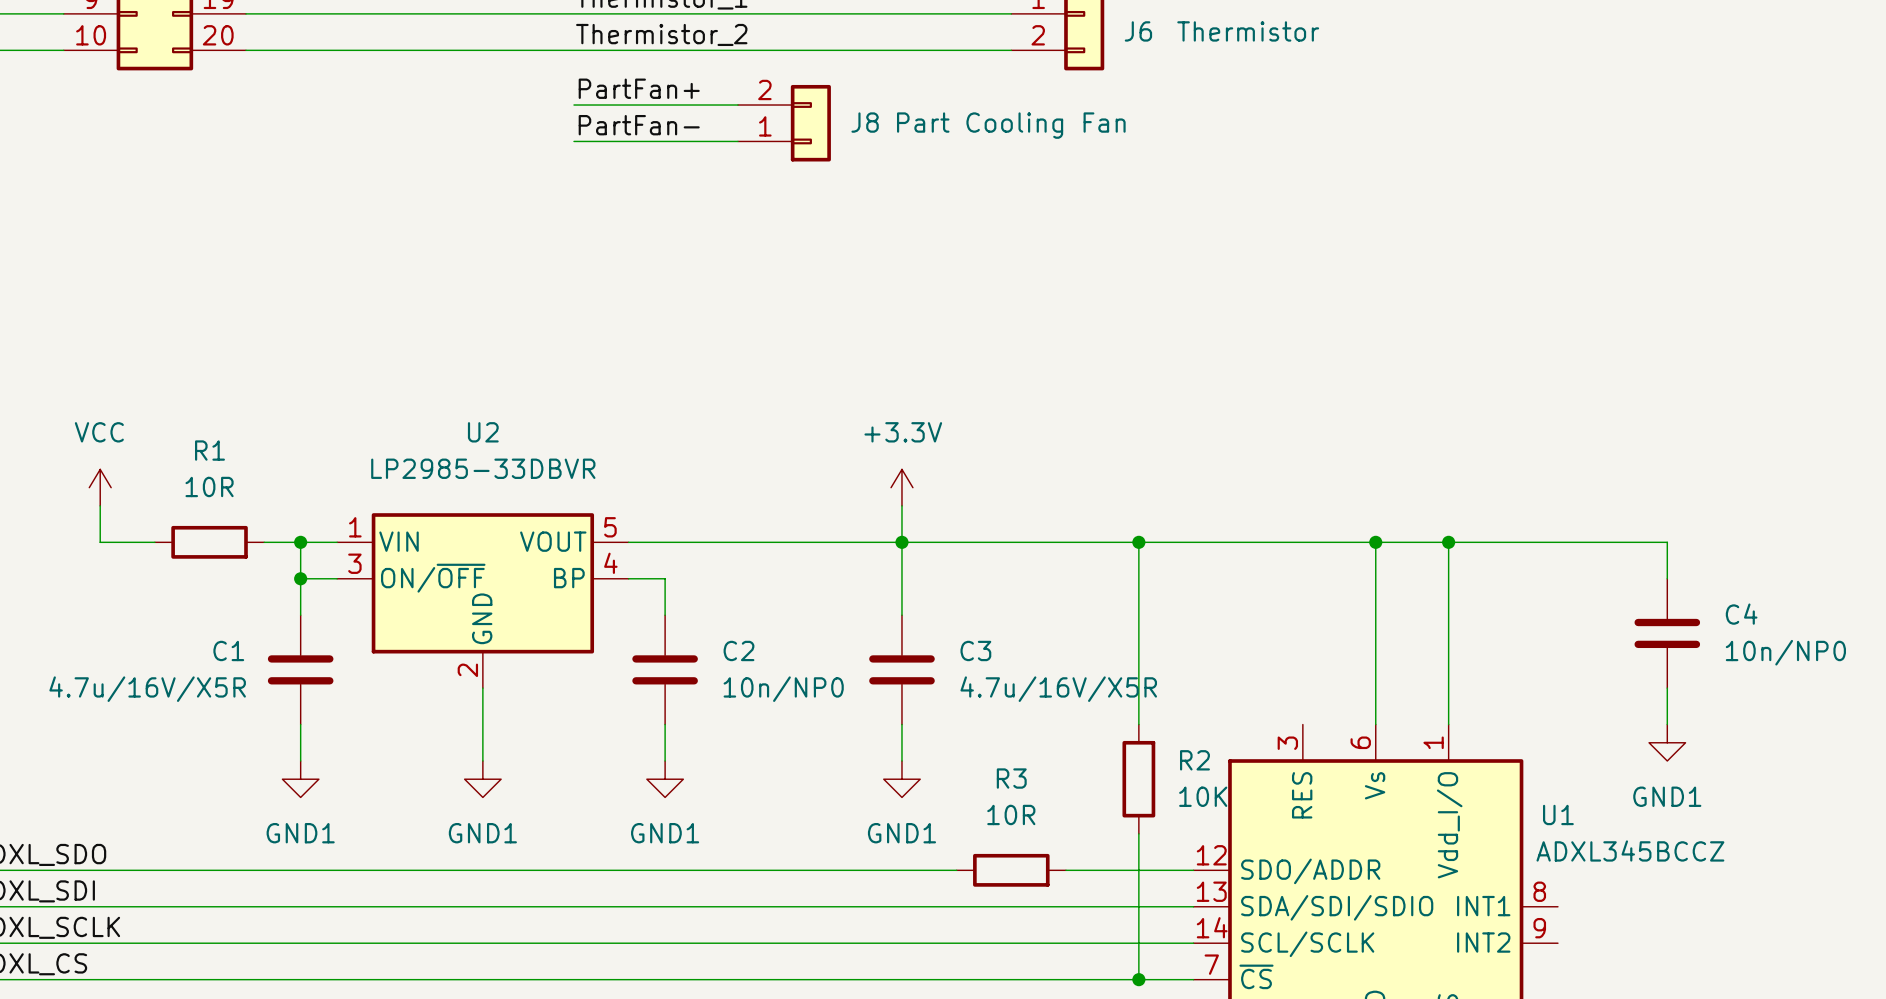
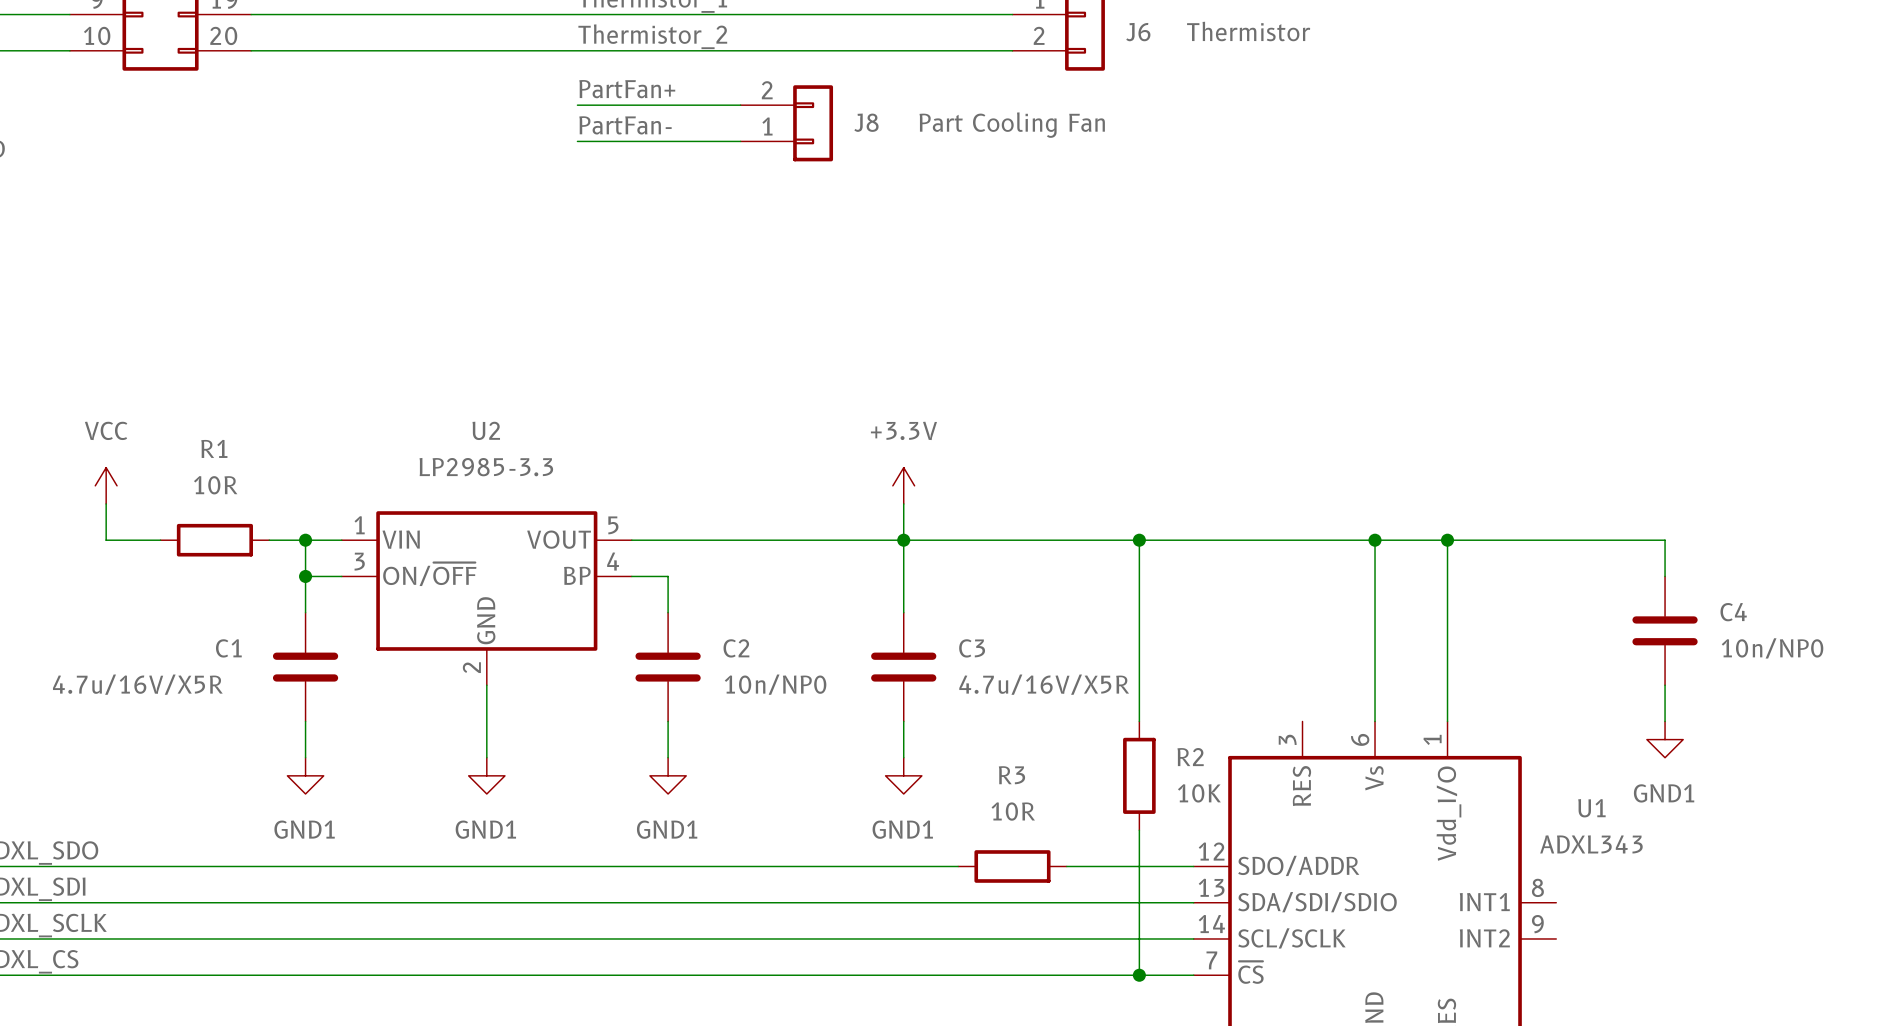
U2 value: LP2985-33DBVR (483, 468) -> LP2985-3.3 (486, 467)
U1 name position: U1 (1558, 814) -> U1 (1591, 808)
U1 value: ADXL345BCCZ (1630, 850) -> ADXL343 (1591, 844)

